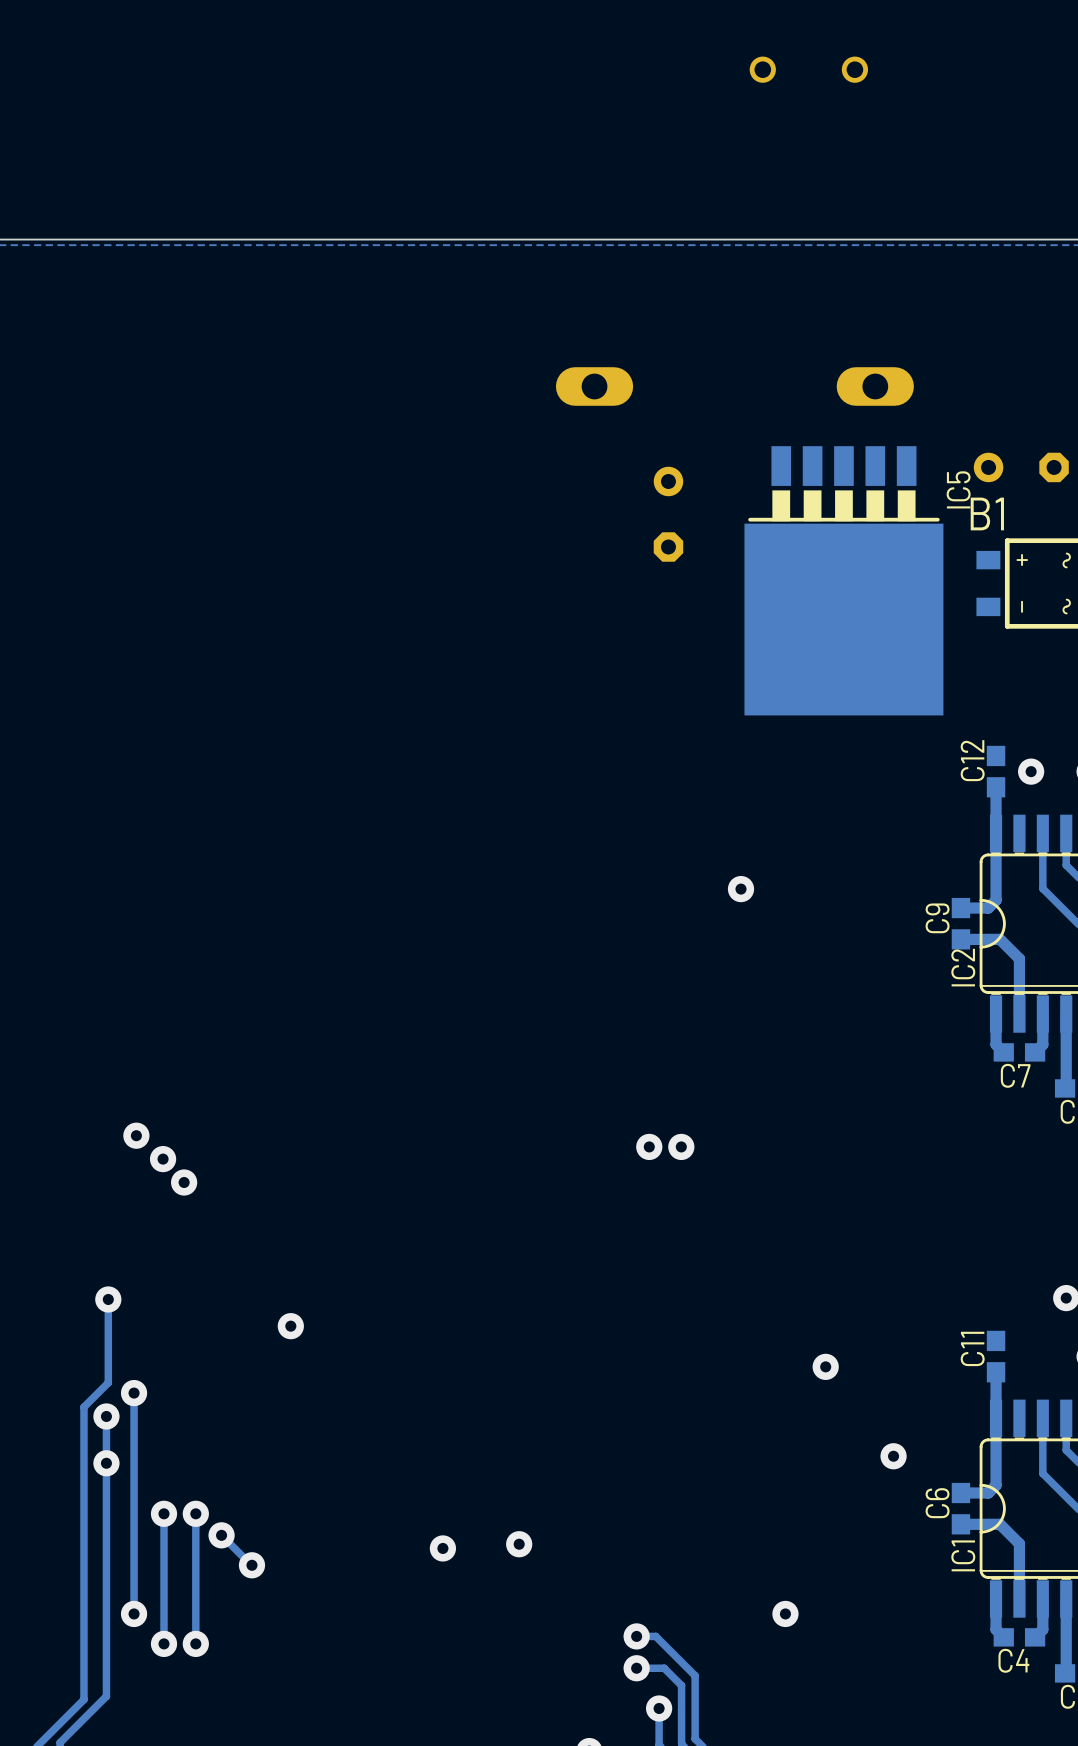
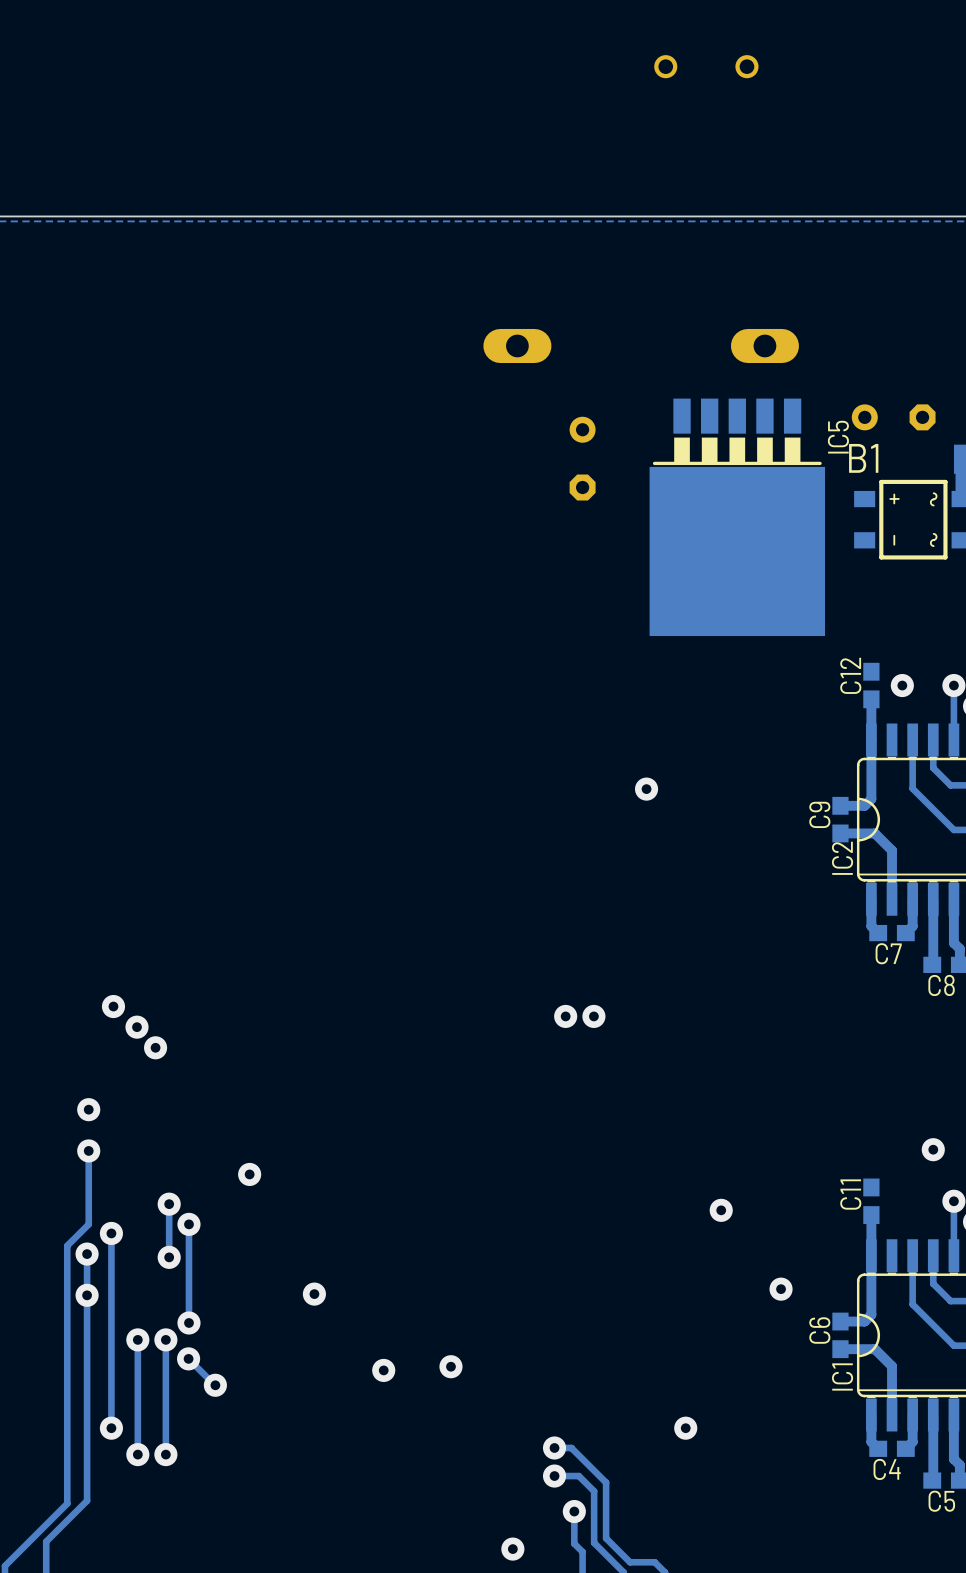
via: none -> (88, 1109)
track: none -> (169, 1204) (169, 1257)
via: none -> (169, 1204)
track: none -> (188, 1224) (188, 1322)
via: none -> (188, 1224)
via: none -> (169, 1257)
via: none -> (314, 1294)
via: none -> (188, 1322)

